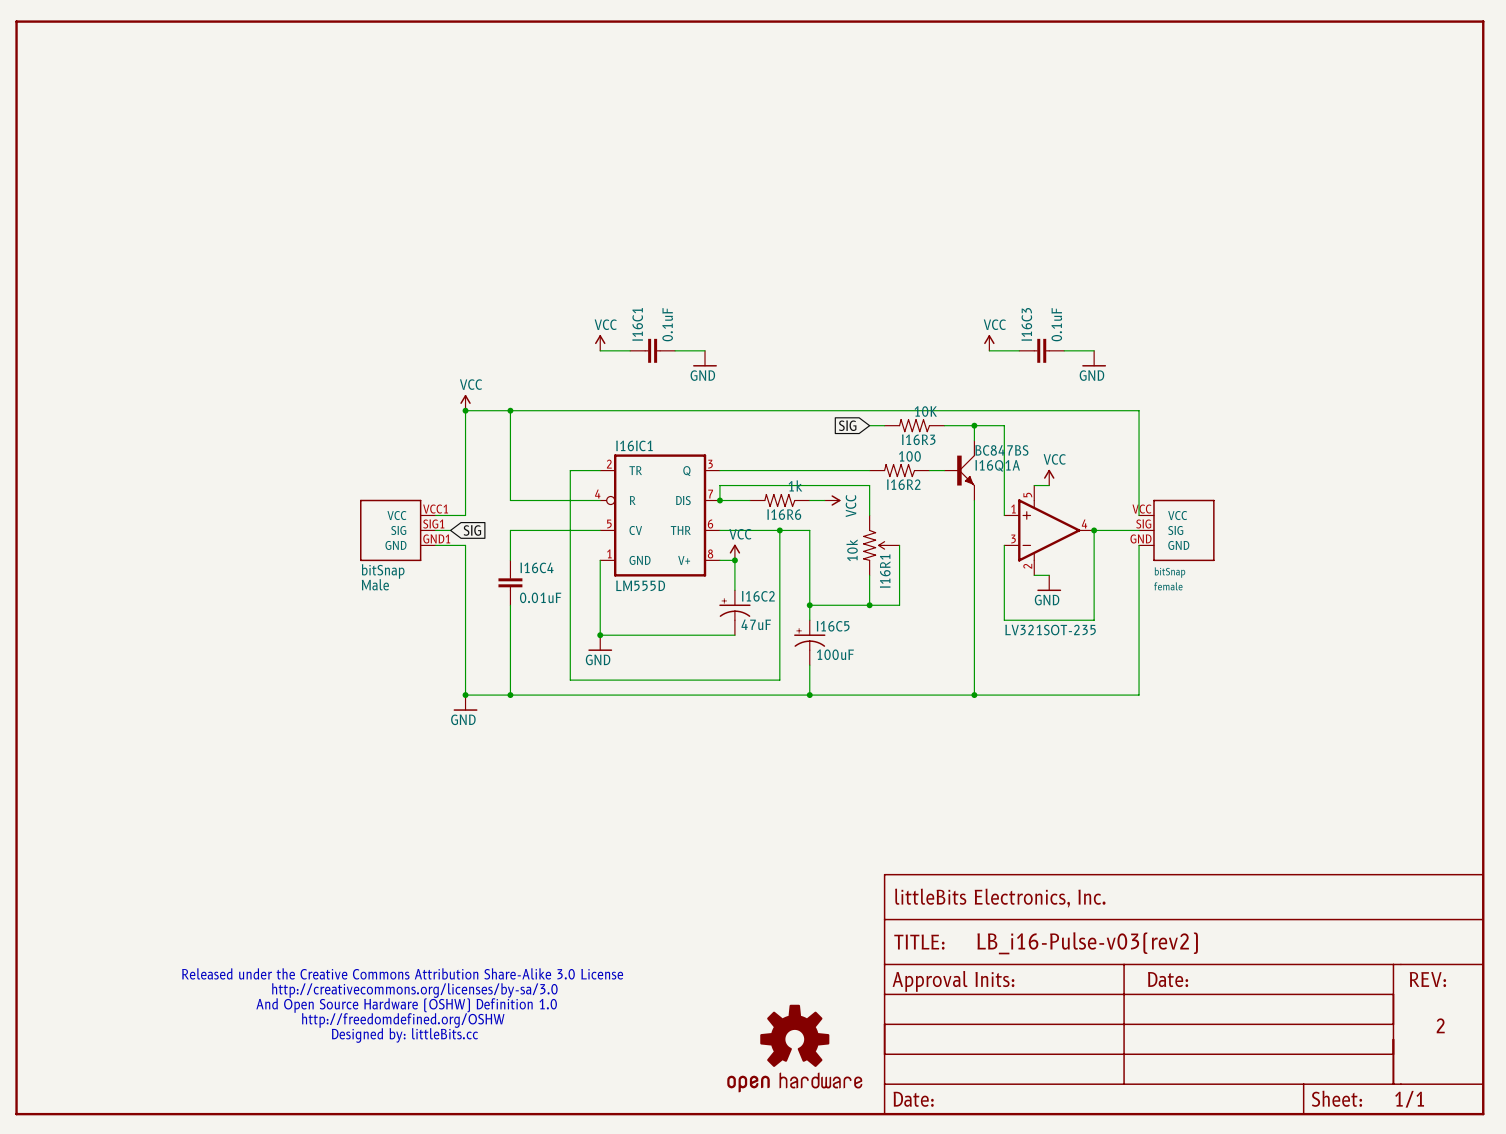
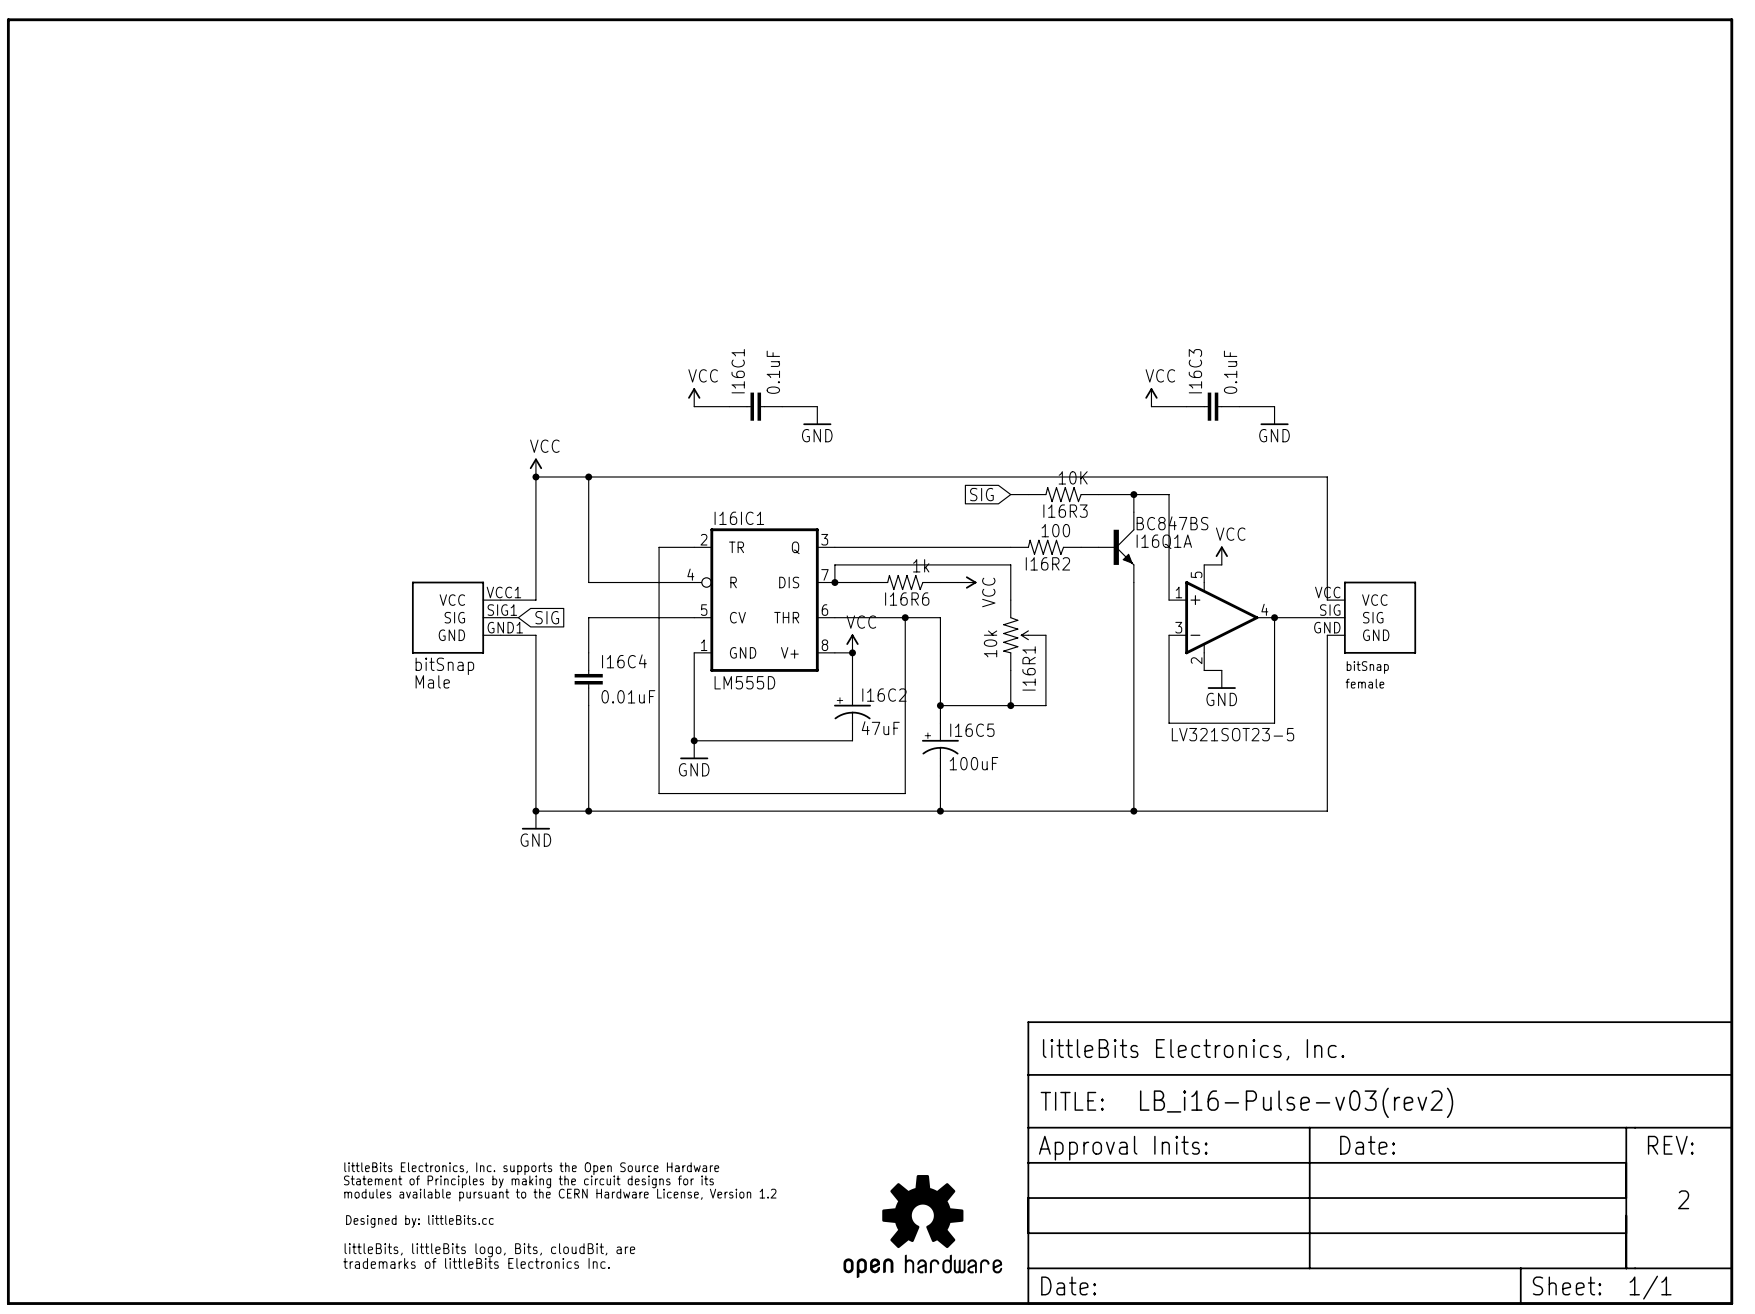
part value: LV321SOT-235 (1050, 630) -> LV321SOT23-5 (1233, 734)
part: (402, 1005) -> none
part: none -> (559, 1215)

